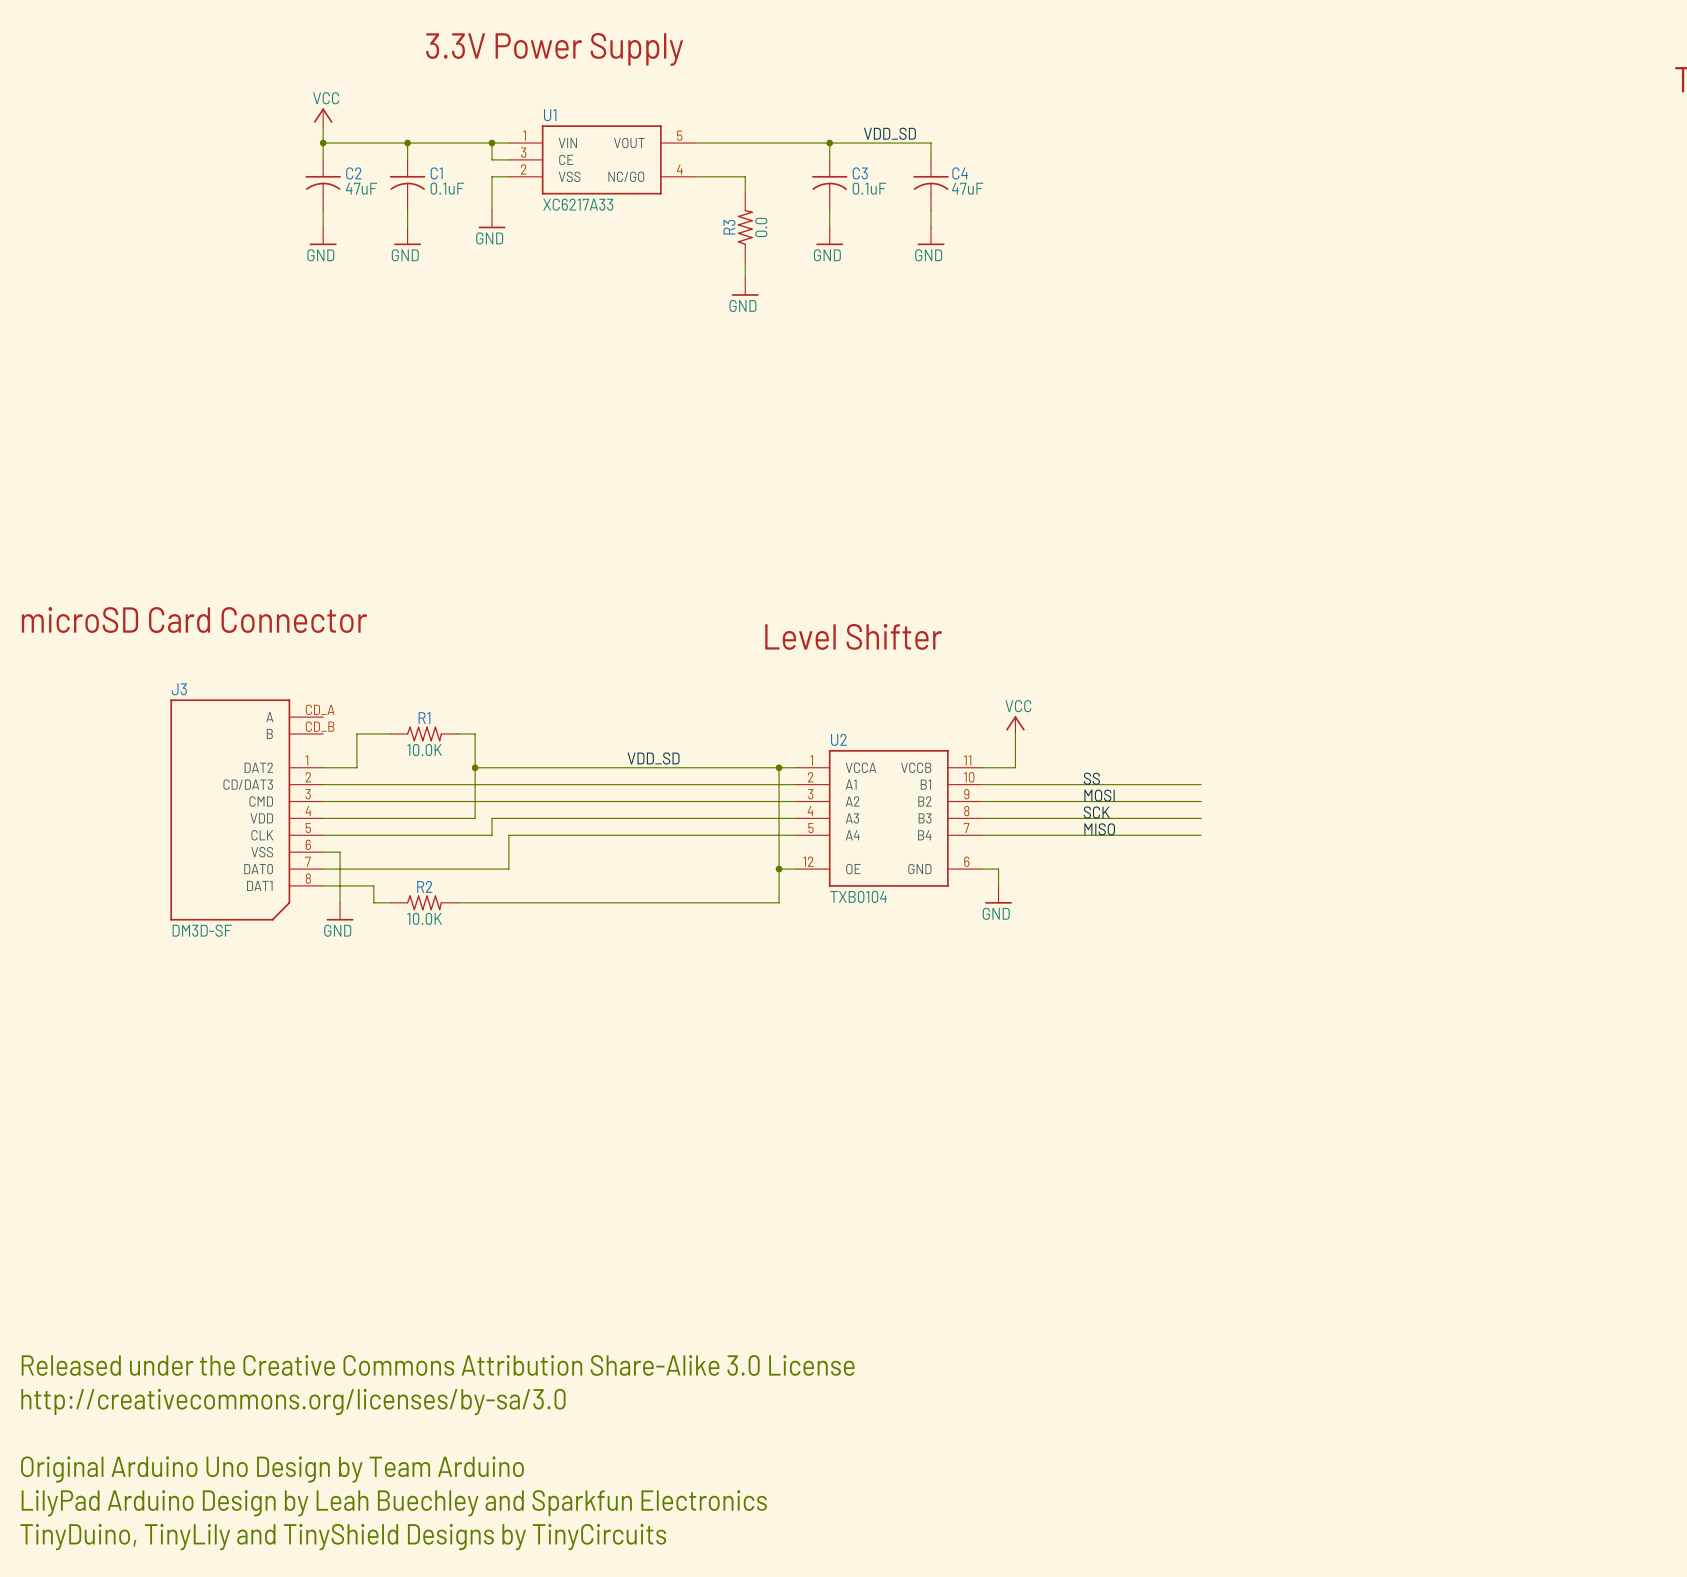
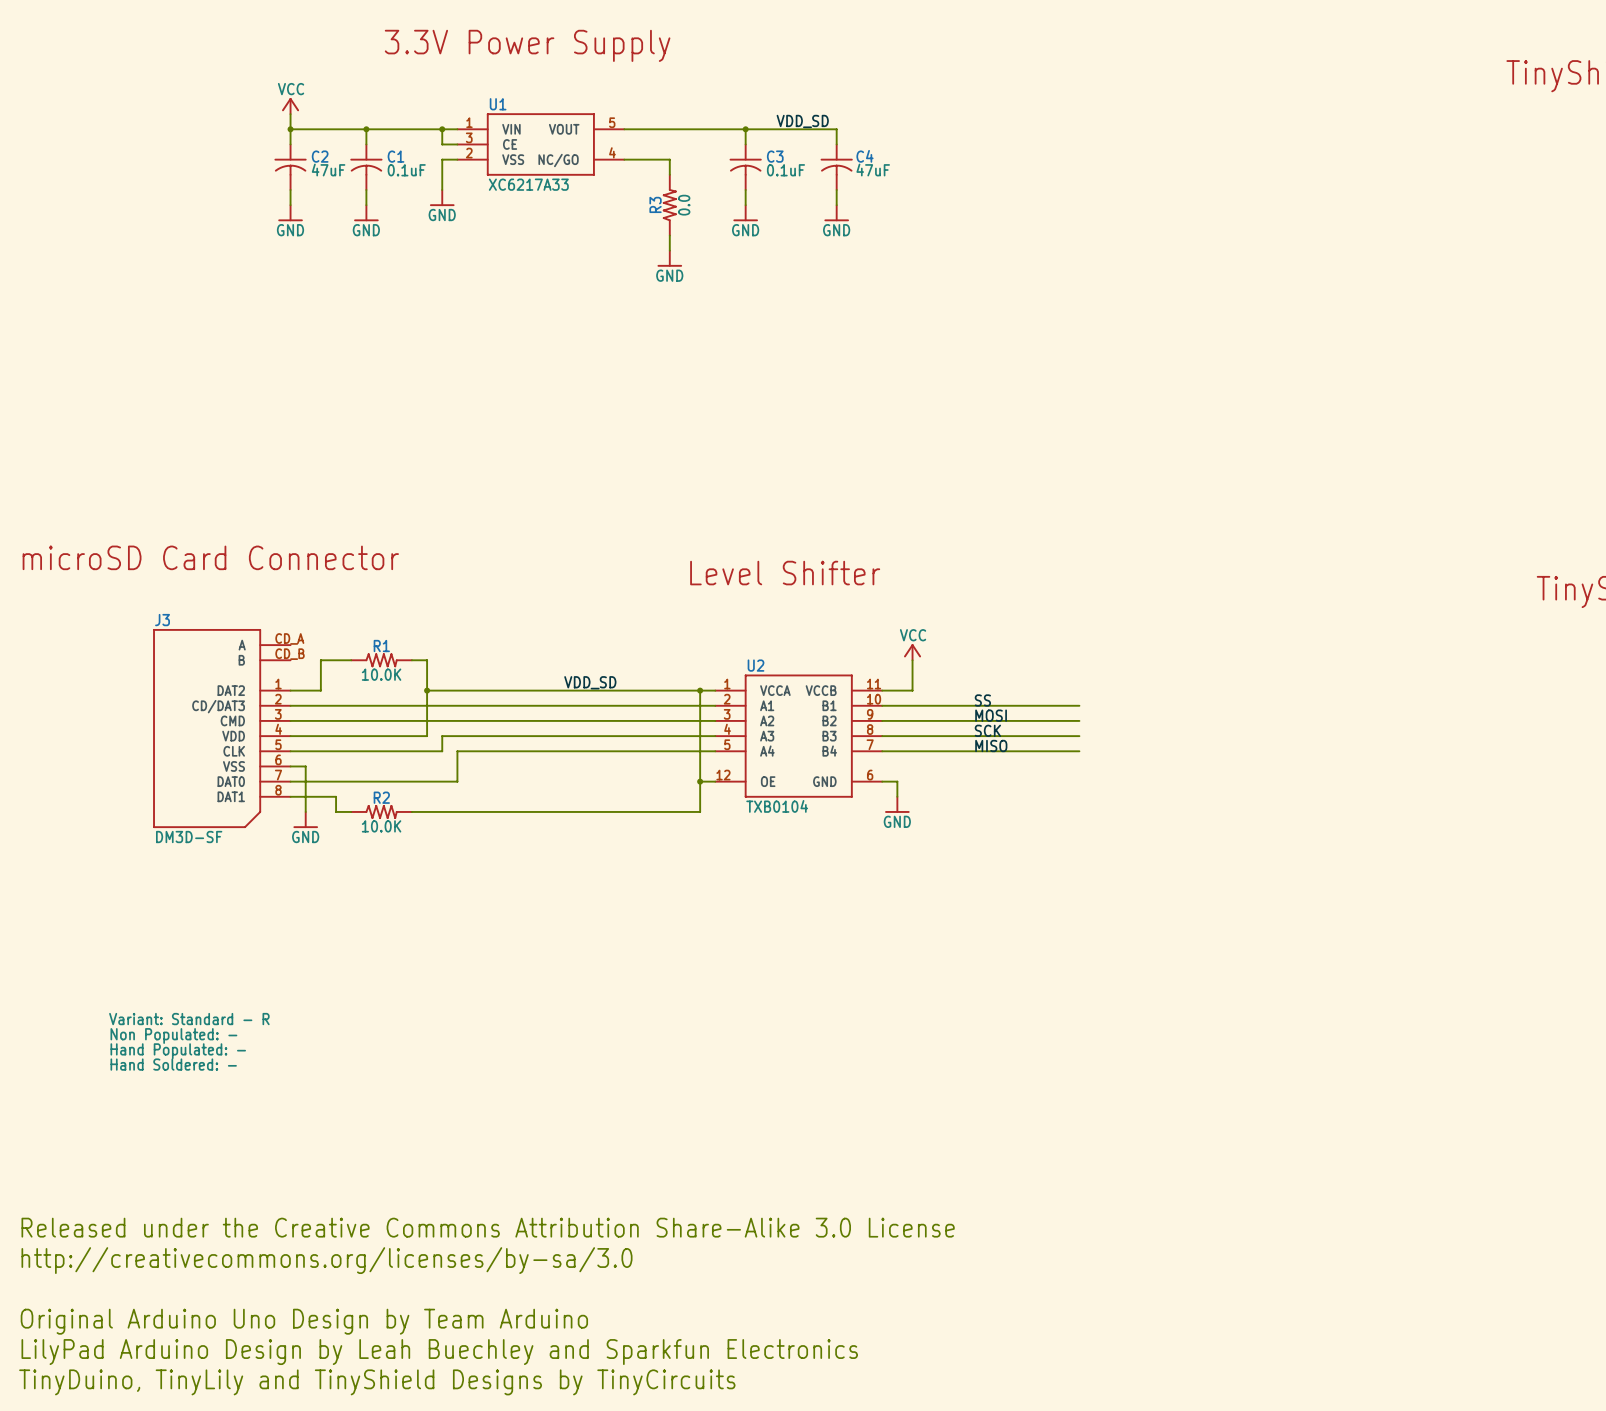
text: none -> Variant: Standard - R (189, 1019)
text: none -> Non Populated: - (173, 1035)
text: none -> Hand Populated: - (178, 1051)
text: none -> Hand Soldered: - (173, 1064)

